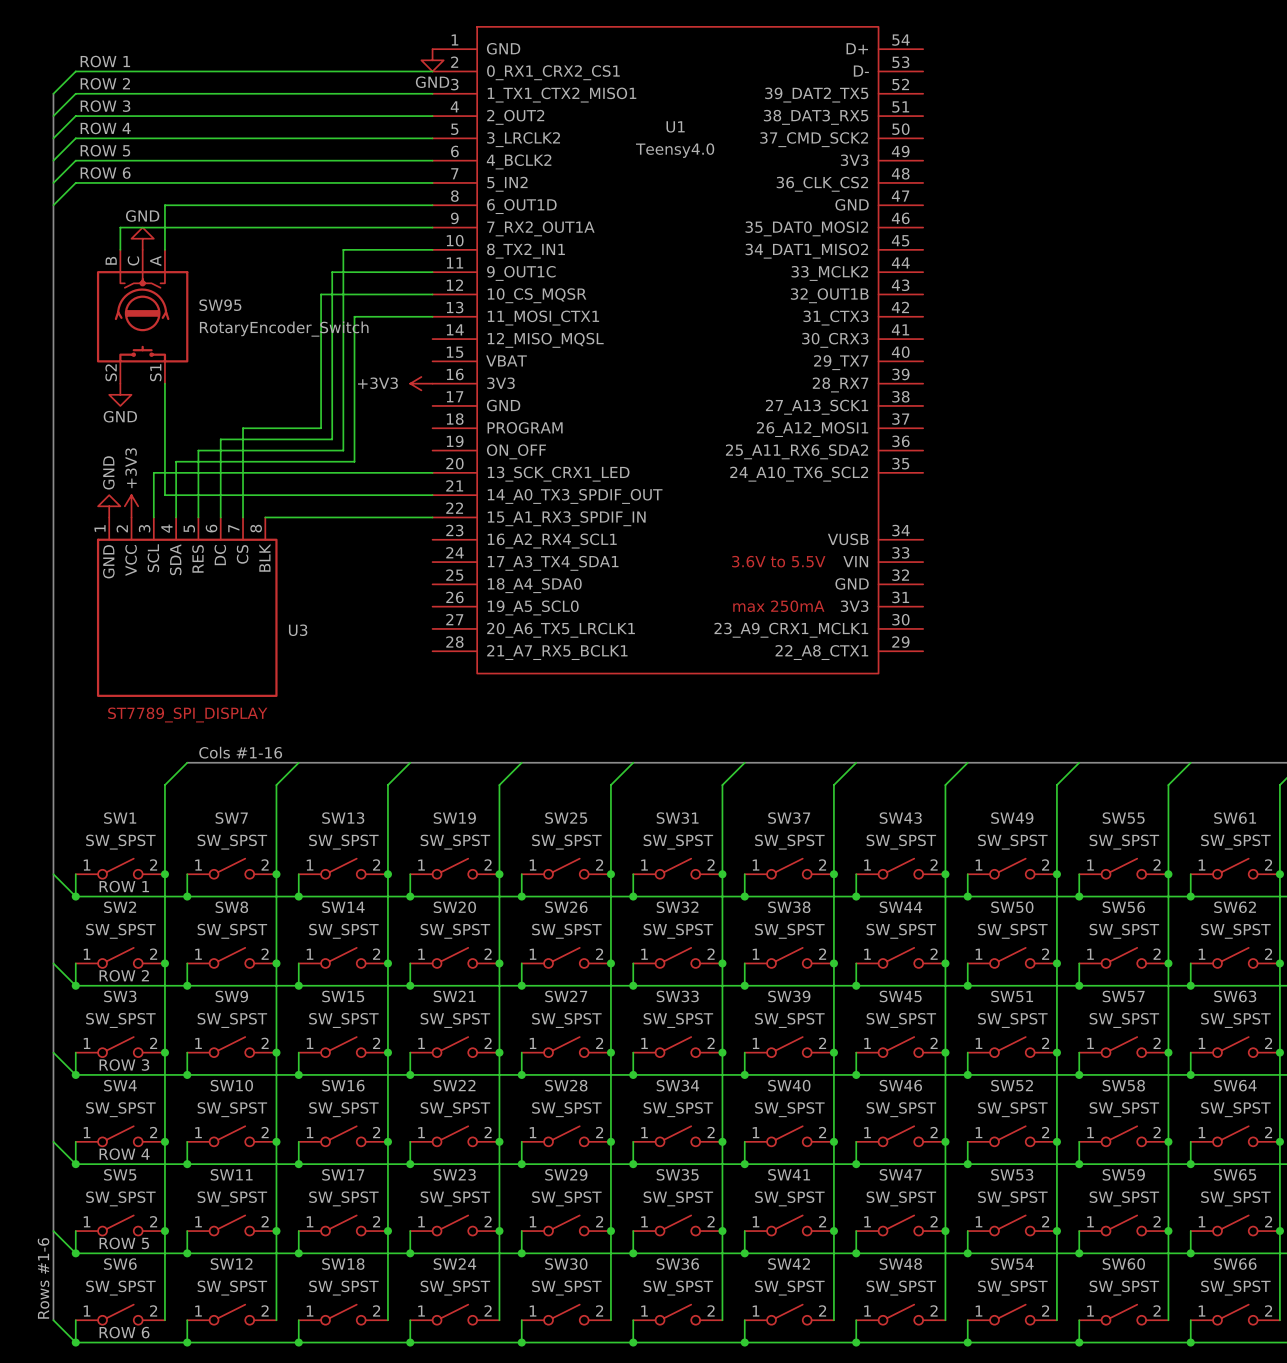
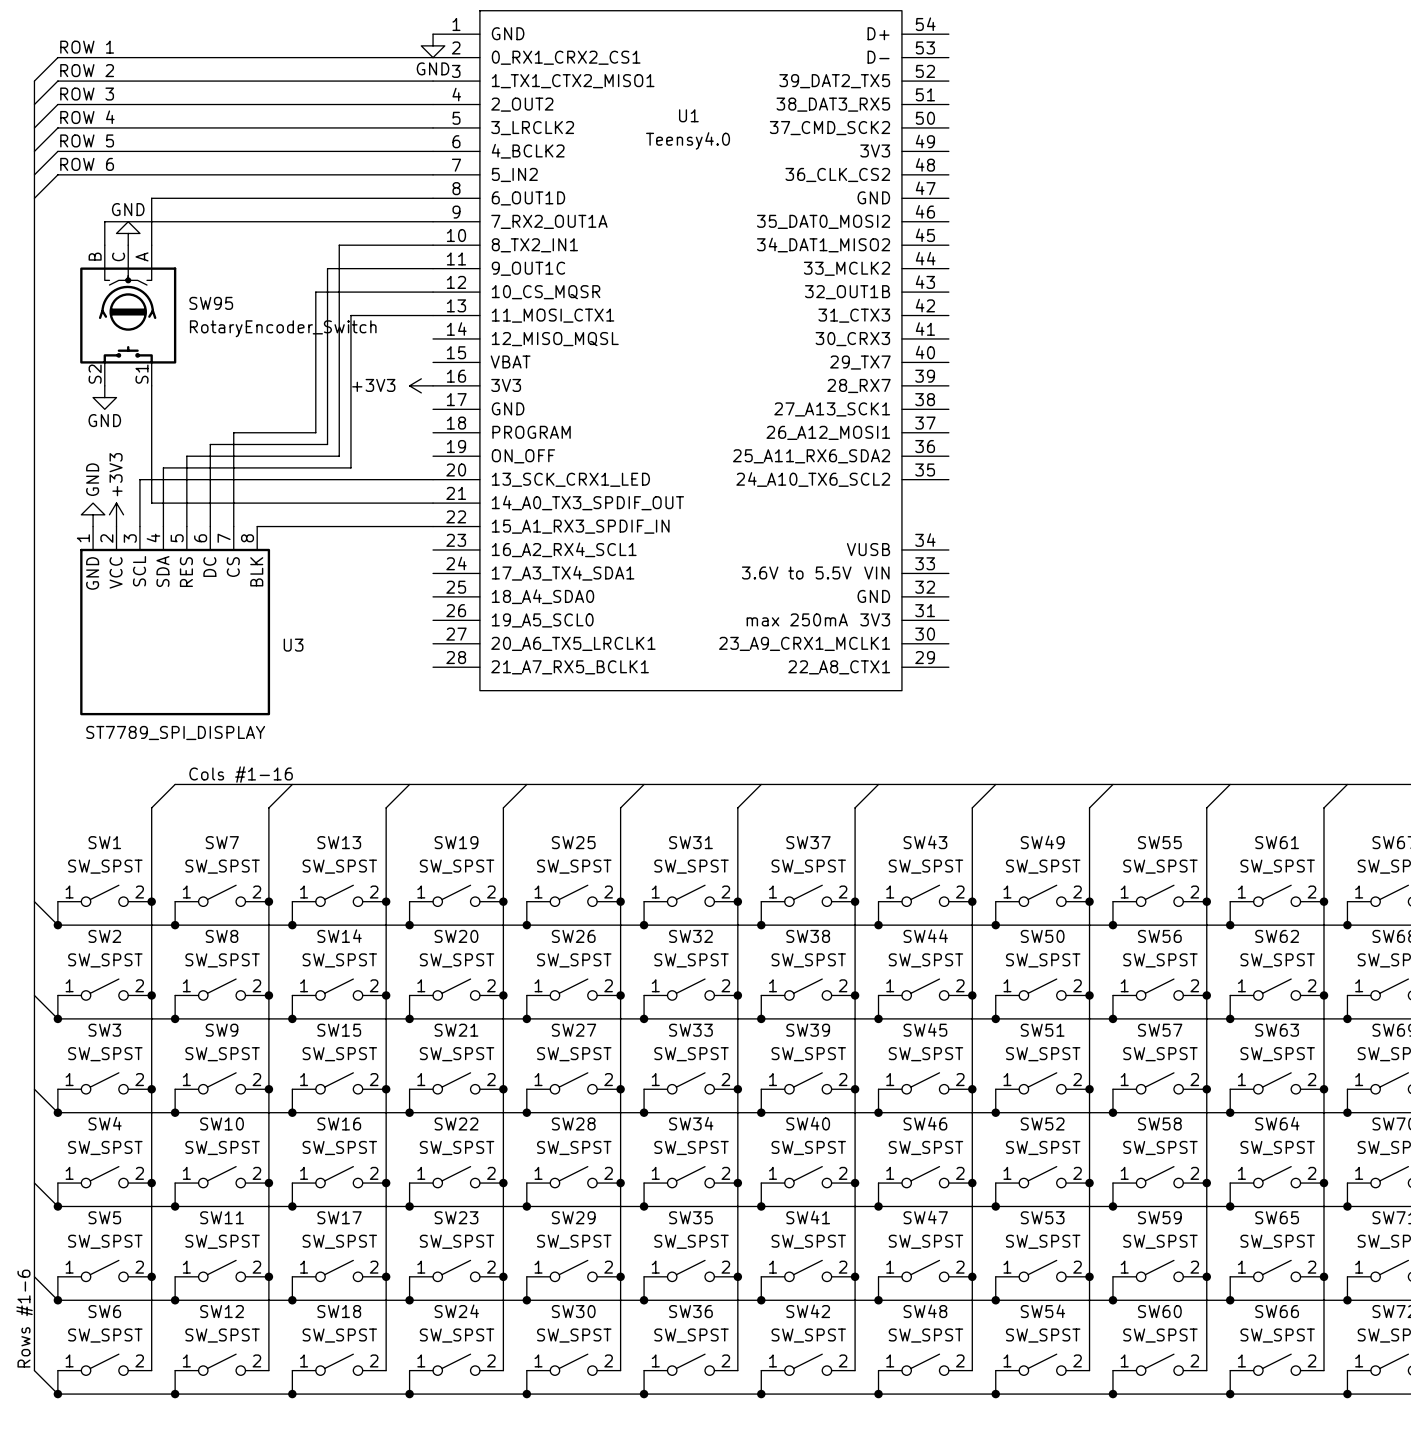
label: ROW 1 (124, 886) -> none
label: ROW 2 (124, 975) -> none
label: ROW 3 (124, 1065) -> none
label: ROW 4 (124, 1154) -> none
label: ROW 5 (124, 1243) -> none
label: ROW 6 (124, 1332) -> none

